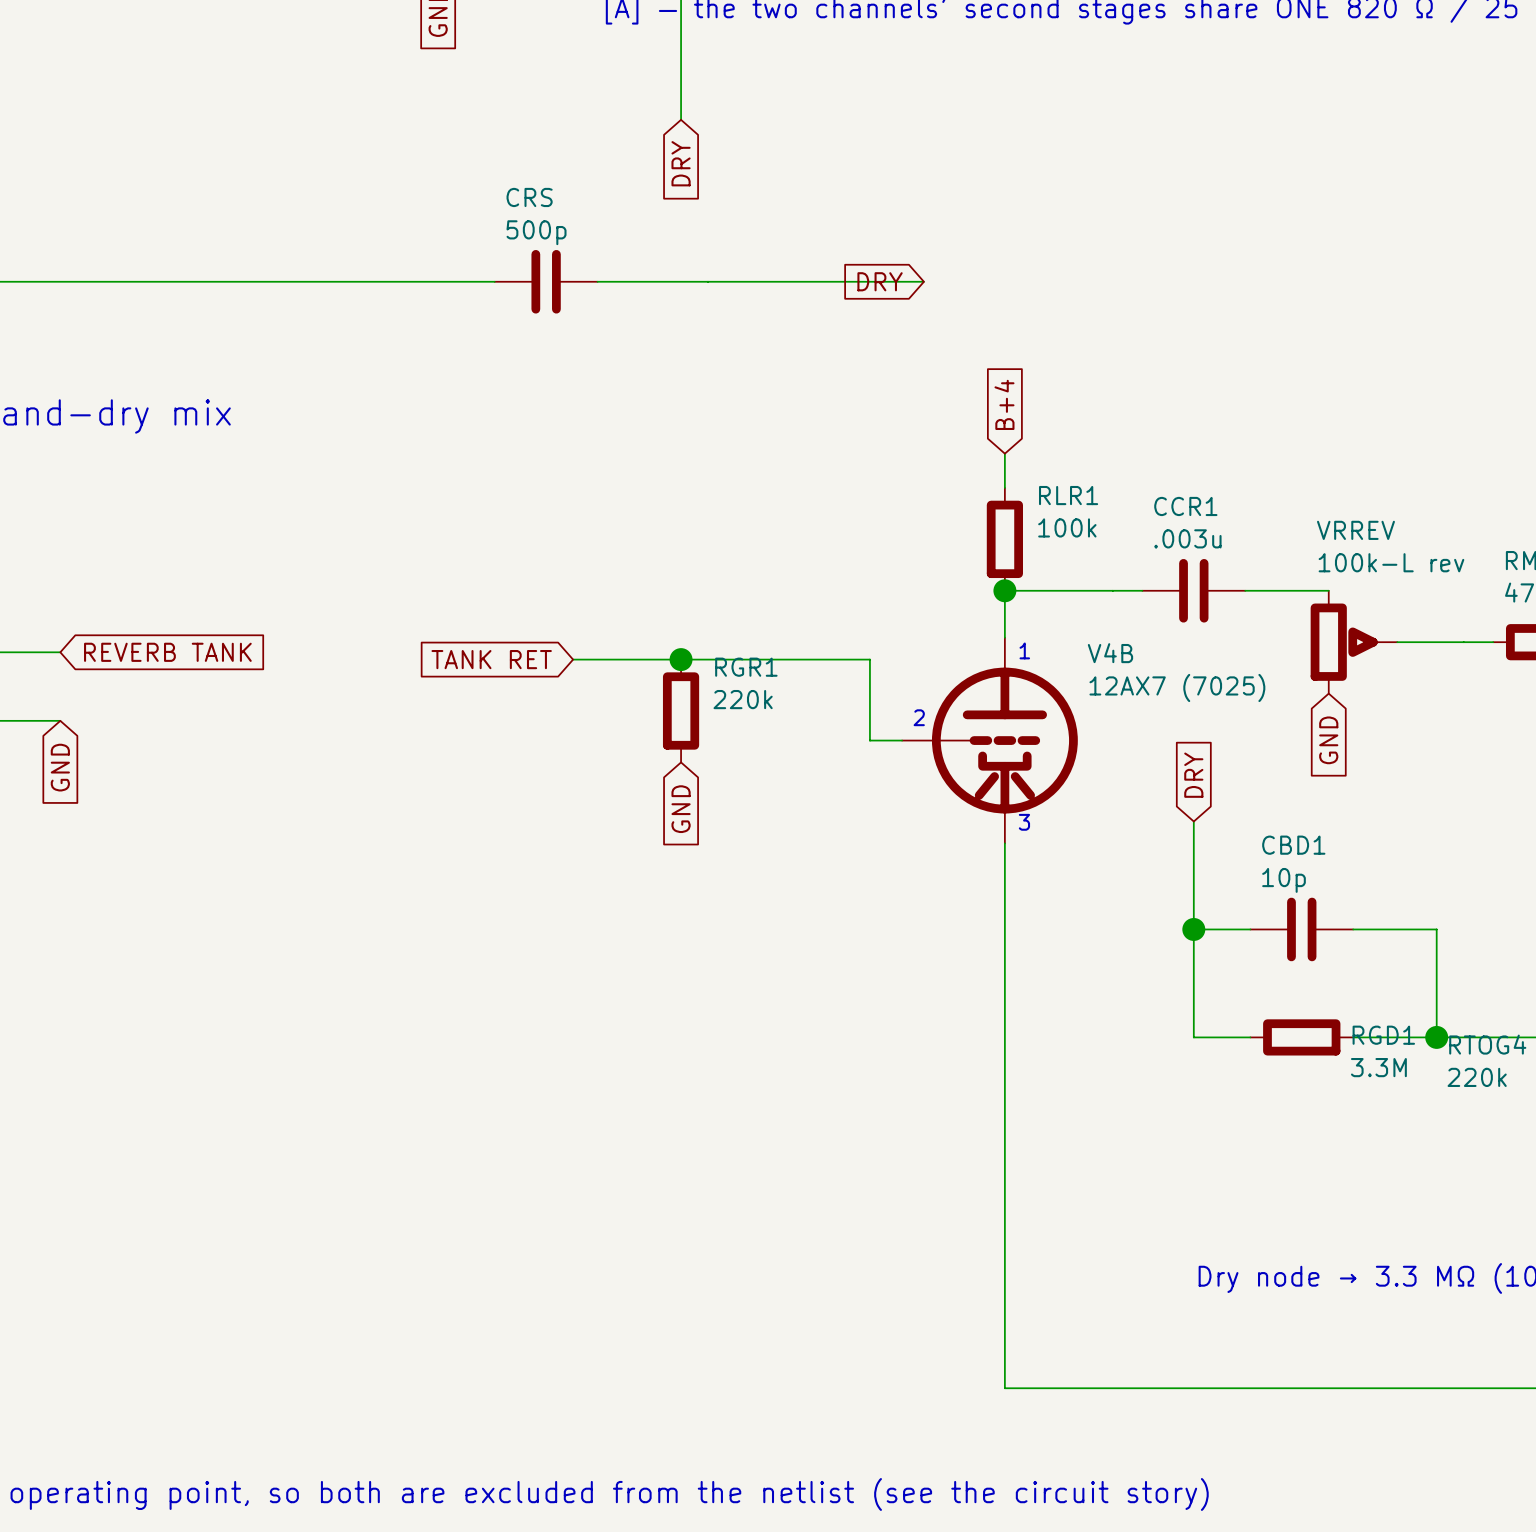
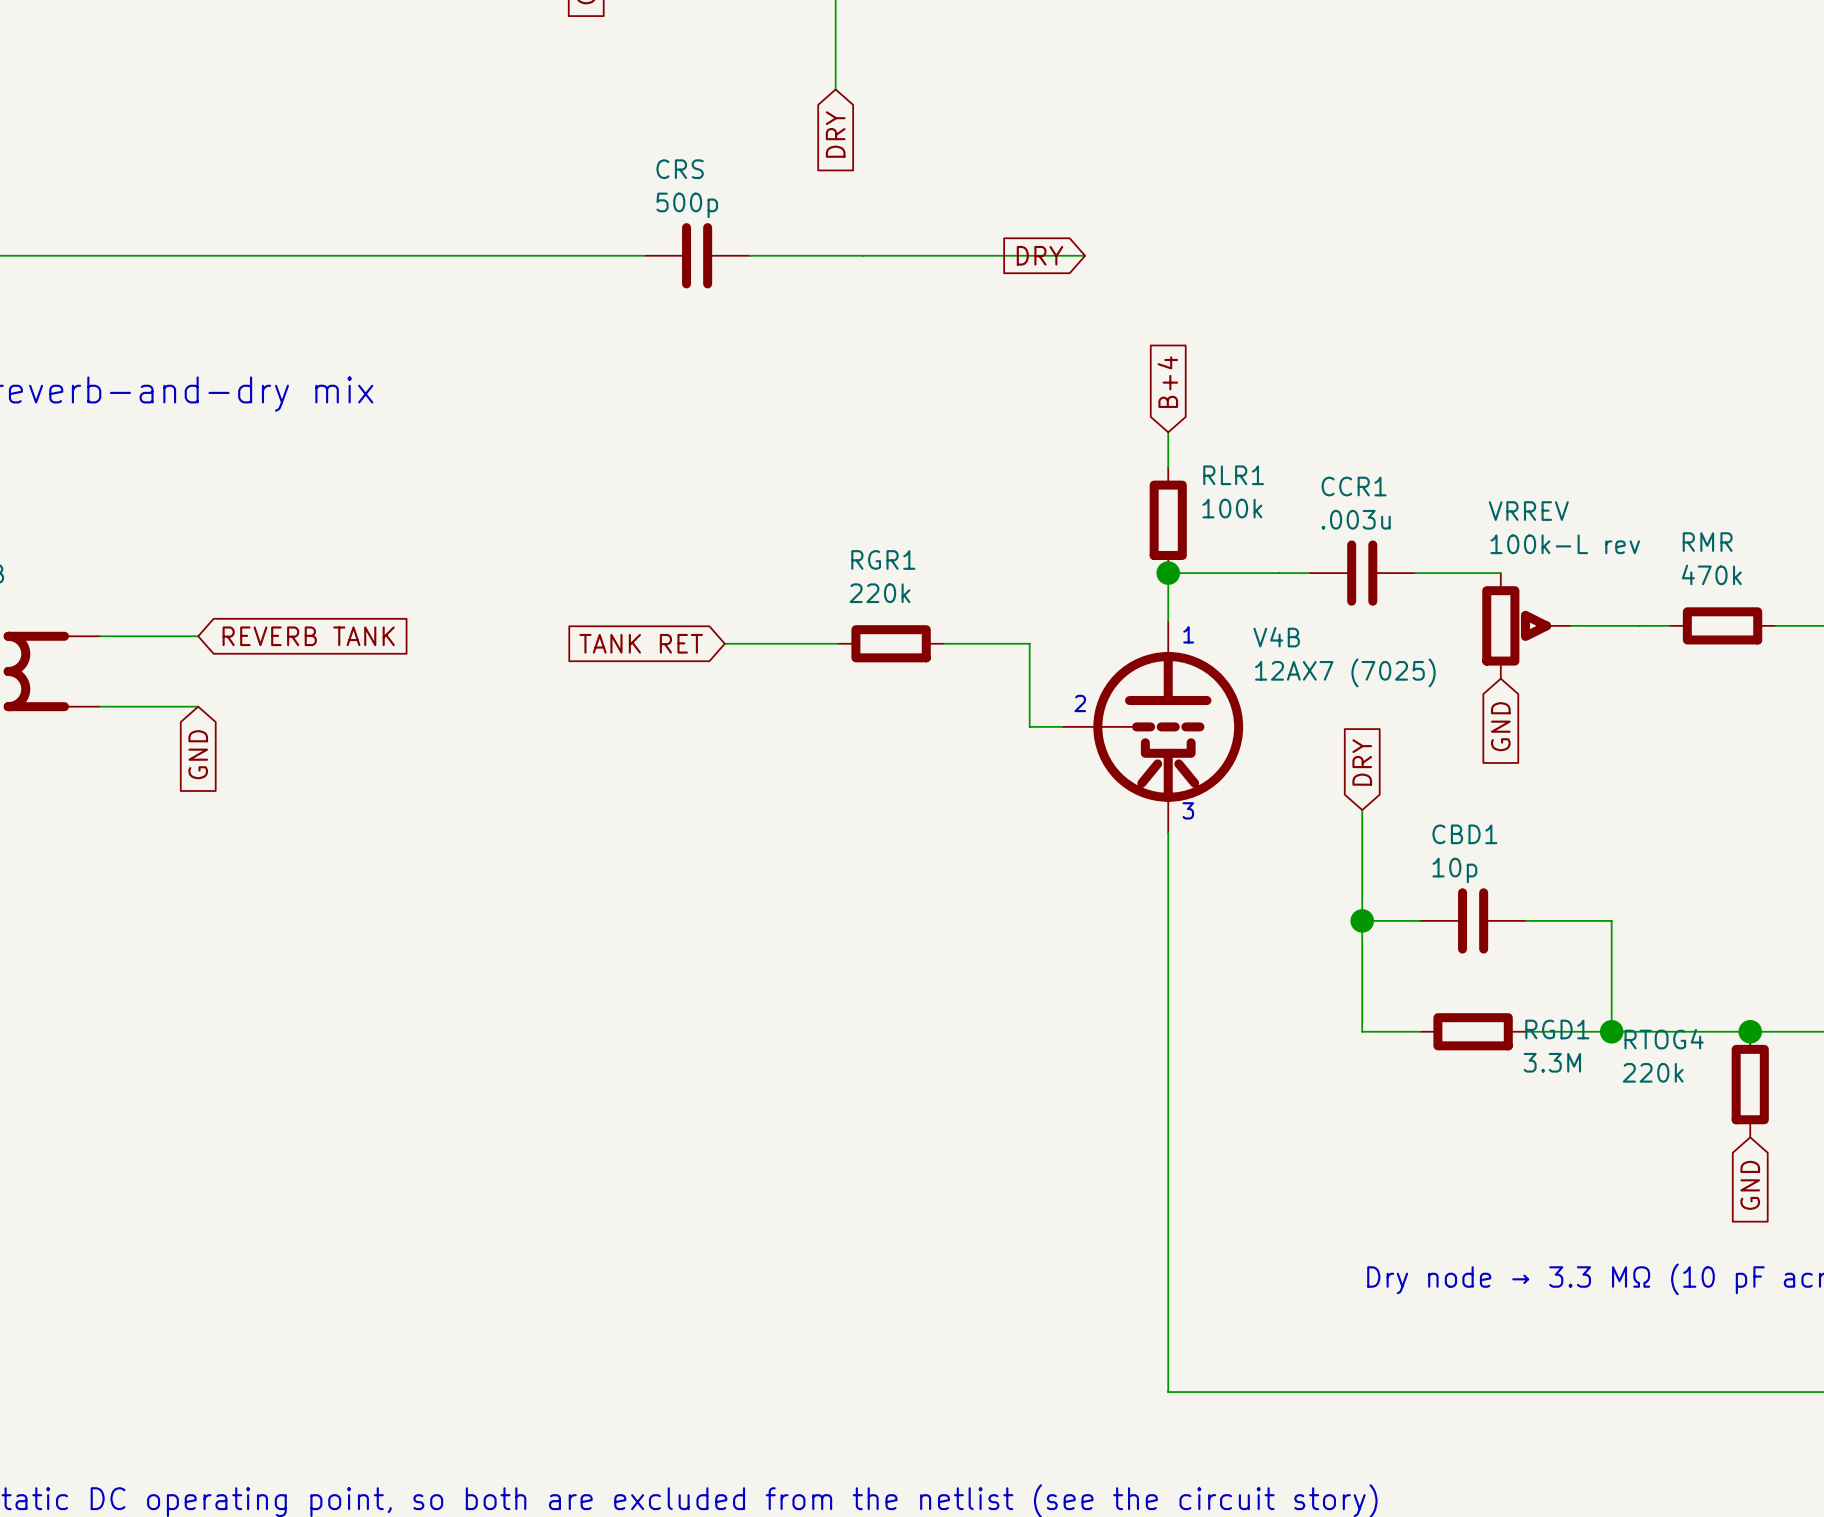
junction: (681, 659) -> none
wire: (683, 659) (786, 659) -> none
RGR1 name position: RGR1 (746, 667) -> RGR1 (883, 559)
RGR1 value position: 220k (743, 699) -> 220k (879, 593)
RGR1 rotation: 0° (681, 711) -> 90° clockwise (891, 643)
RGR1 position: (681, 711) -> (891, 643)
global label: GND (681, 809) -> none

